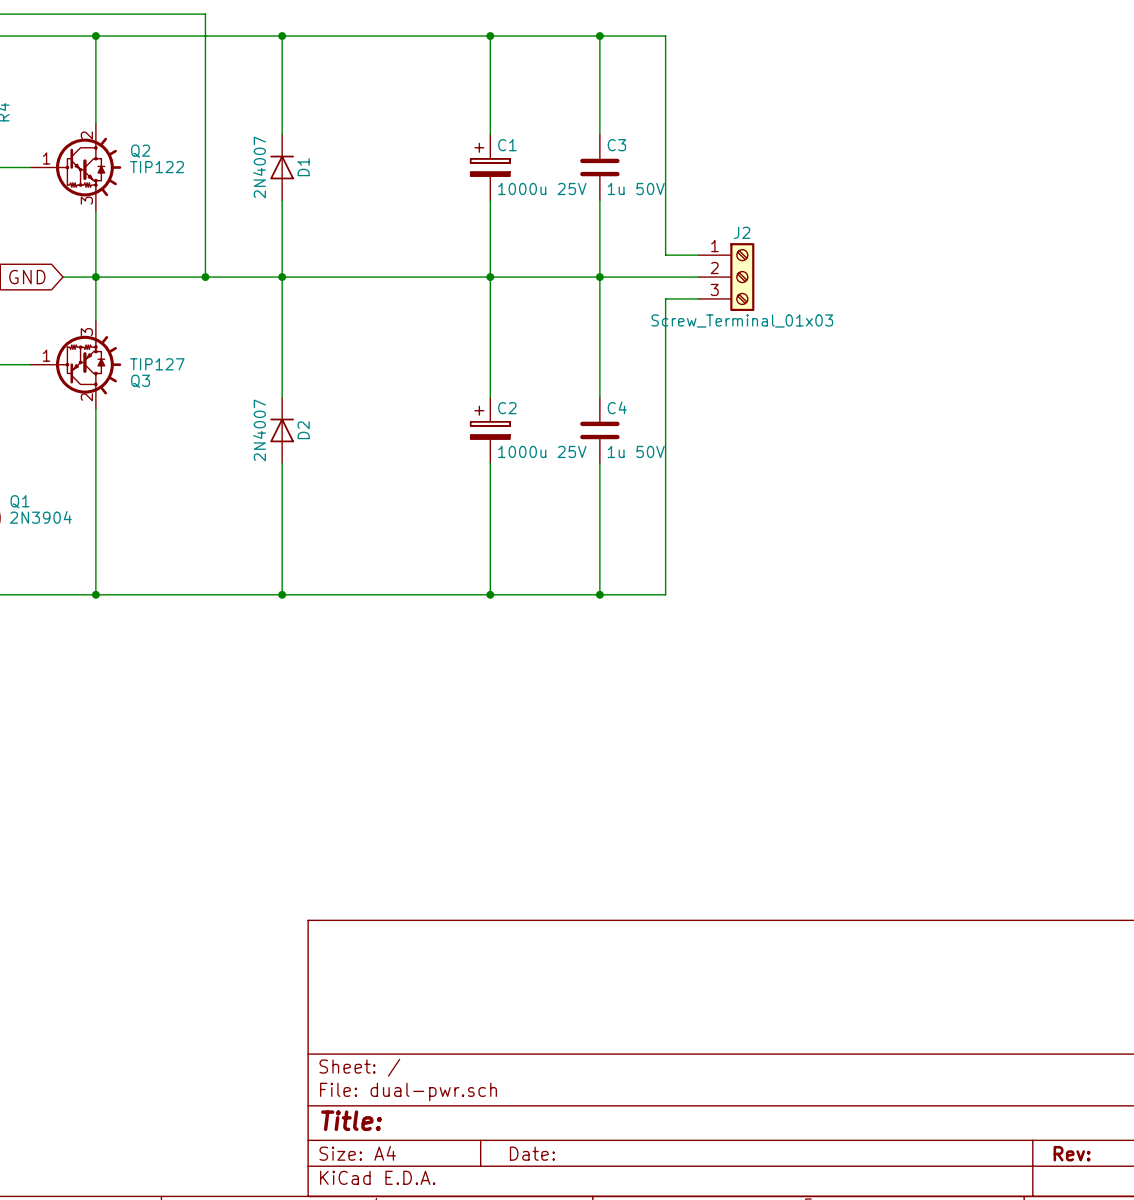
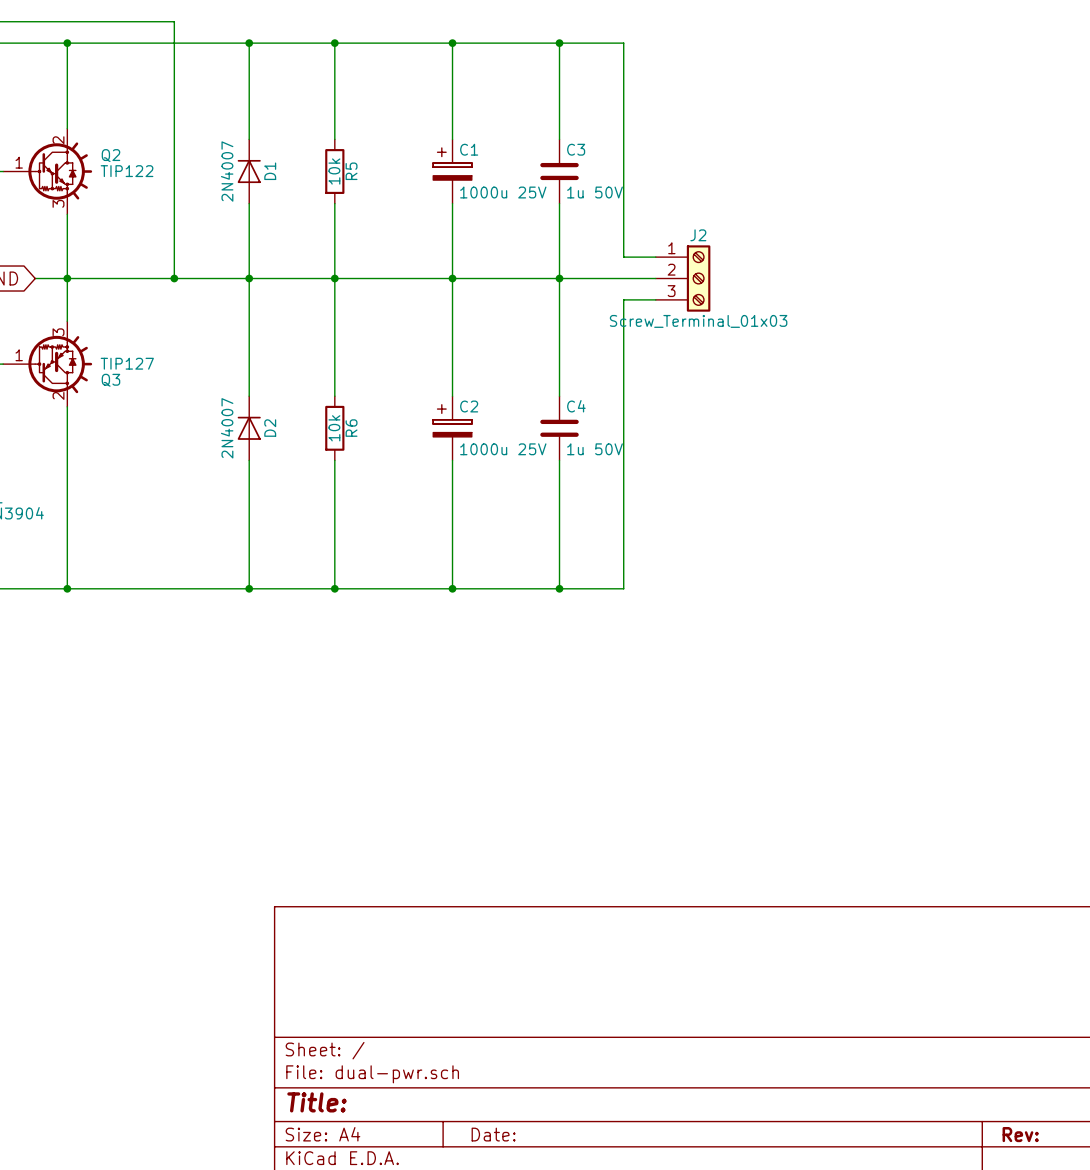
wire: none -> (334, 43) (334, 139)
junction: none -> (334, 43)
R5: none -> 10k (334, 171)
wire: none -> (334, 203) (334, 396)
junction: none -> (334, 278)
R6: none -> 10k (334, 428)
wire: none -> (334, 460) (334, 588)
junction: none -> (334, 588)

